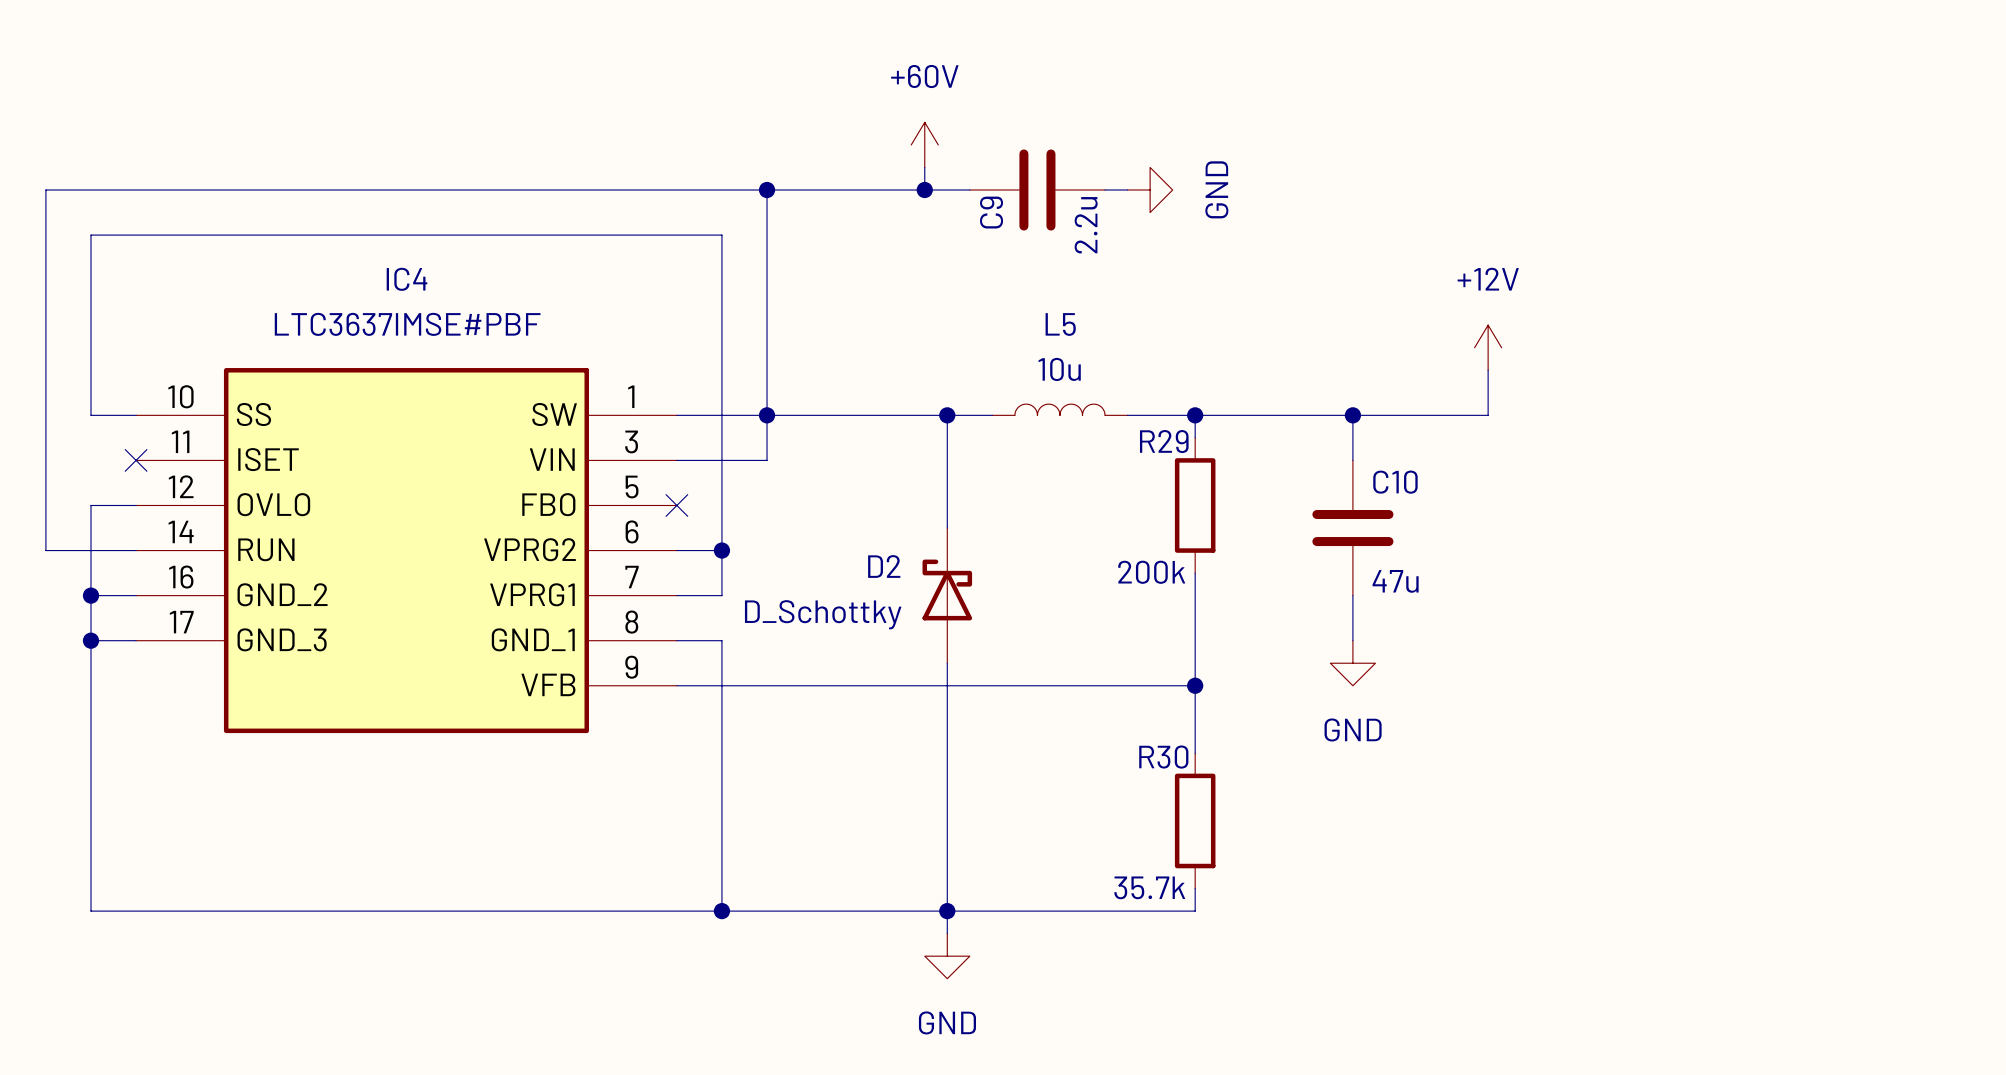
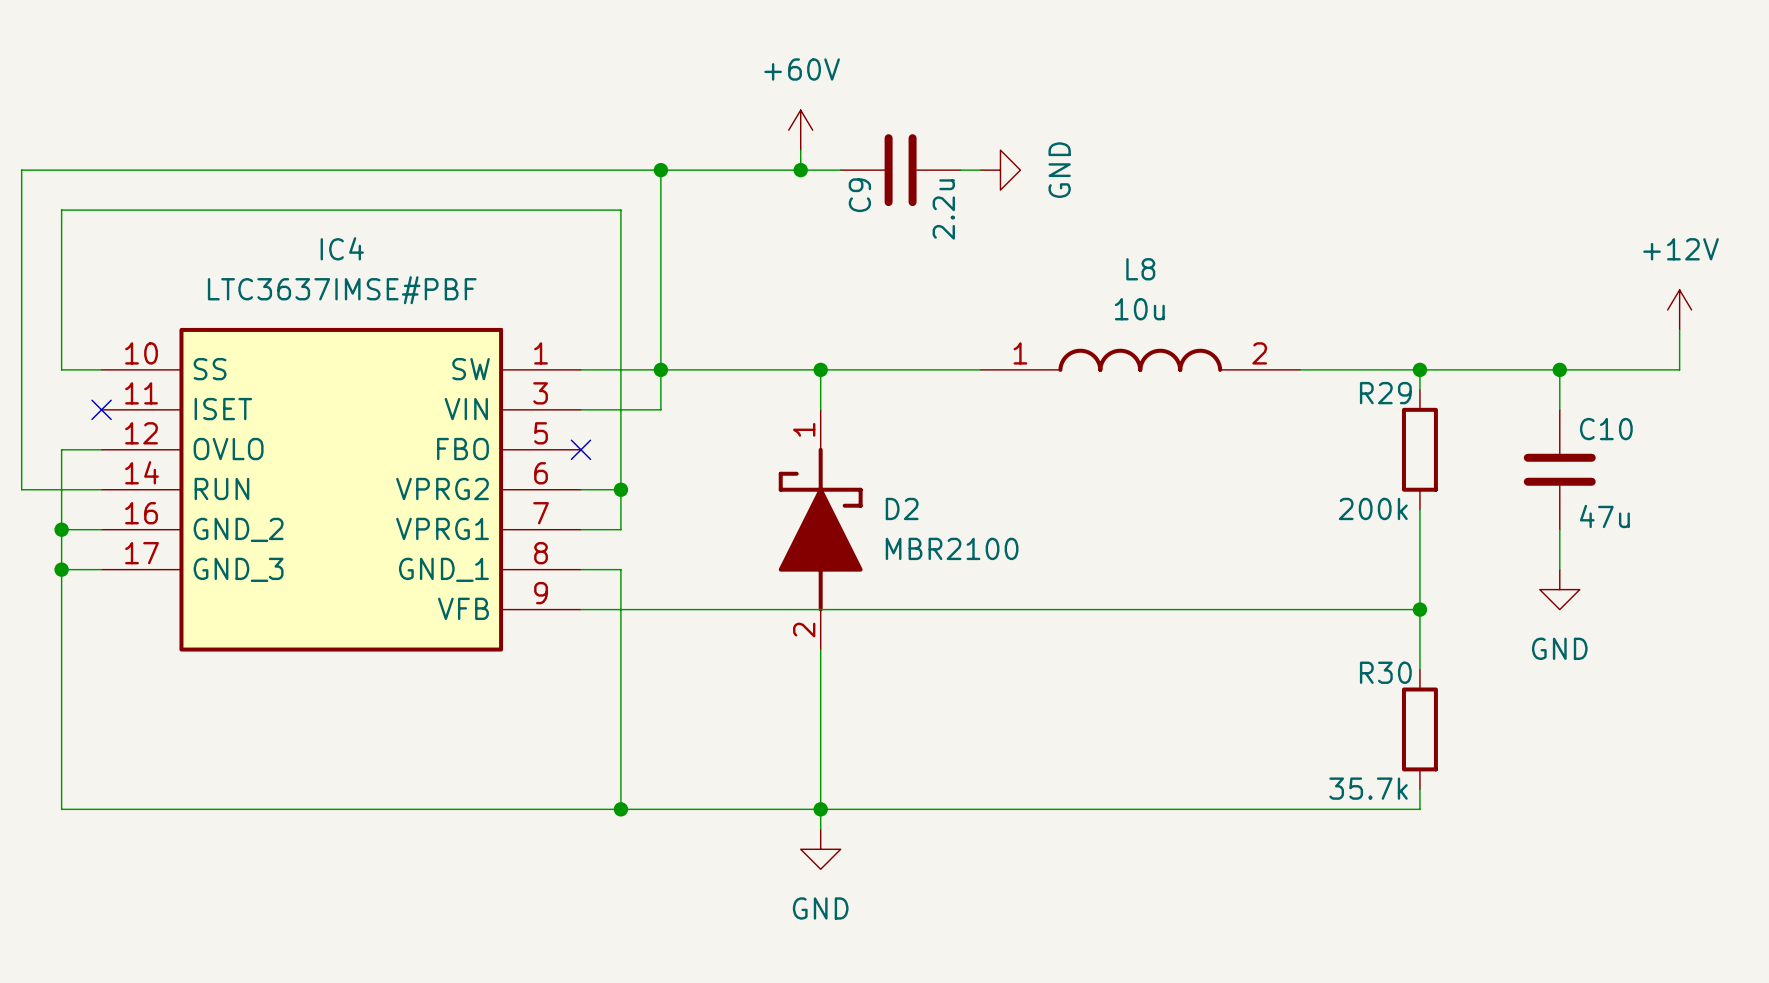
power symbol position: +12V (1488, 347) -> +12V (1679, 309)
wire: (1488, 370) (1488, 415) (1127, 415) -> (860, 369) (980, 369)
wire: none -> (1679, 329) (1679, 369) (1300, 369)
L8: none -> 10u (1140, 360)
L5: 10u (1059, 409) -> none
wire: (1195, 415) (1195, 437) -> (1419, 369) (1419, 389)
junction: (1195, 415) -> none
wire: (1352, 415) (1352, 460) -> (1559, 369) (1559, 409)
junction: (1352, 415) -> none
junction: none -> (1419, 369)
junction: none -> (1559, 369)
R29 position: (1195, 505) -> (1419, 449)
D2 symbol: [922, 528, 973, 664] -> [778, 409, 863, 650]
C10 position: (1352, 528) -> (1559, 469)
D2 name position: D2 (884, 566) -> D2 (902, 508)
wire: (1195, 573) (1195, 753) -> (1419, 509) (1419, 669)
wire: (1352, 595) (1352, 640) -> (1559, 529) (1559, 569)
D2 value: D_Schottky (823, 614) -> MBR2100 (952, 548)
power symbol position: GND (1352, 663) -> GND (1559, 589)
wire: none -> (1040, 609) (1419, 609)
junction: (1195, 685) -> none
junction: none -> (1419, 609)
R30 position: (1195, 820) -> (1419, 729)
wire: (1195, 888) (1195, 911) -> (1419, 789) (1419, 809) (1040, 809)

